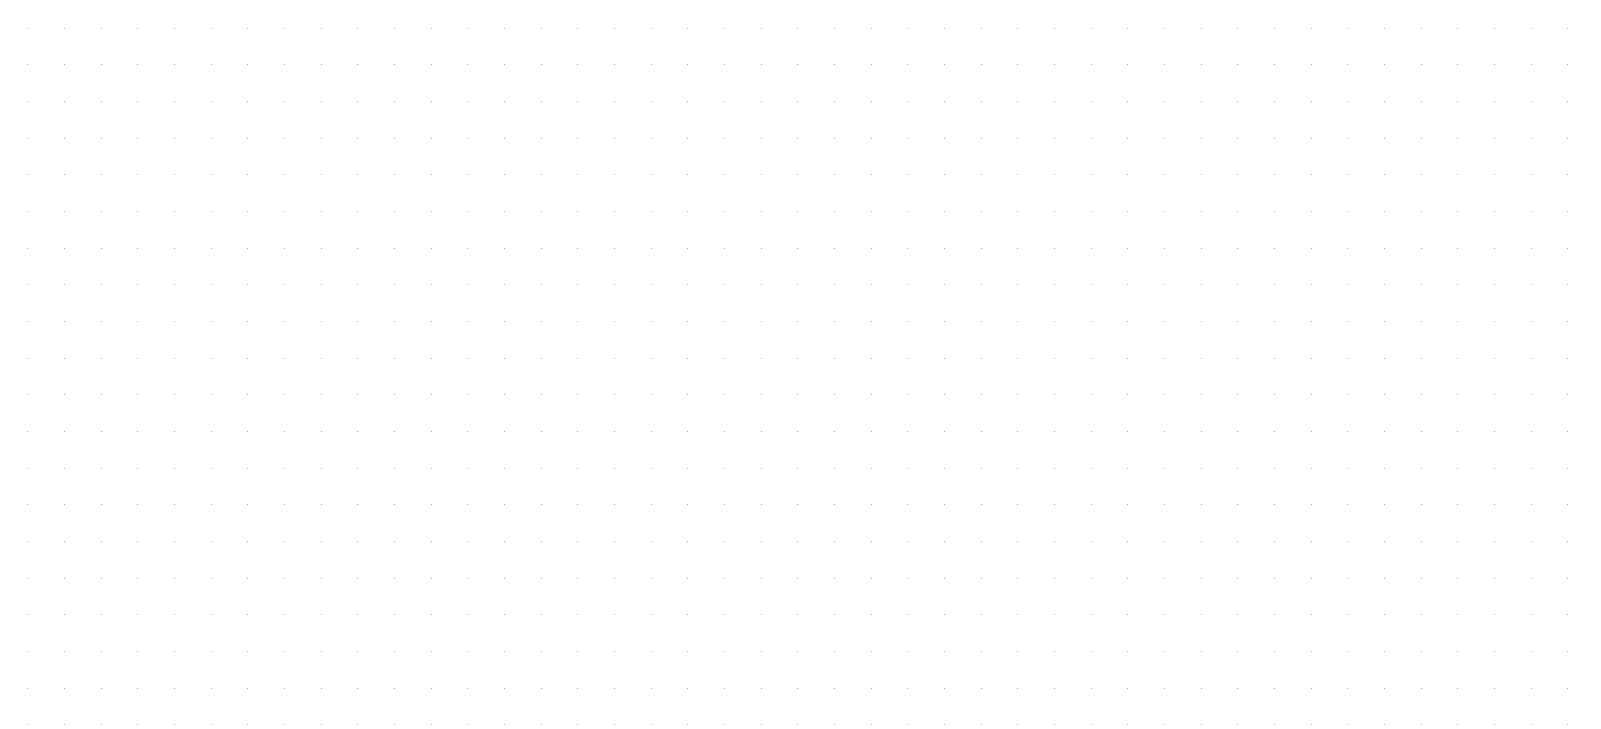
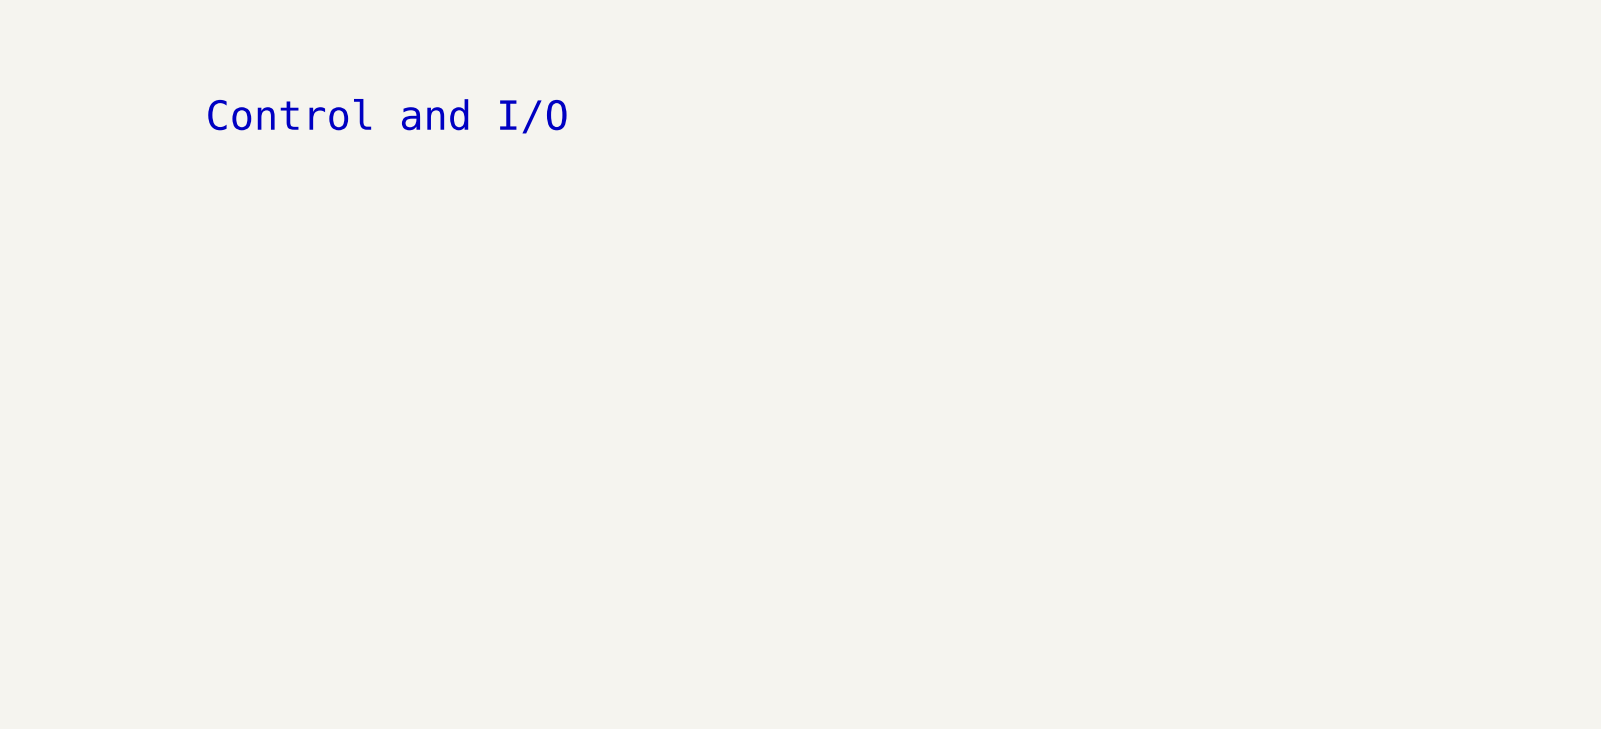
text: none -> Control and I/O (387, 116)

